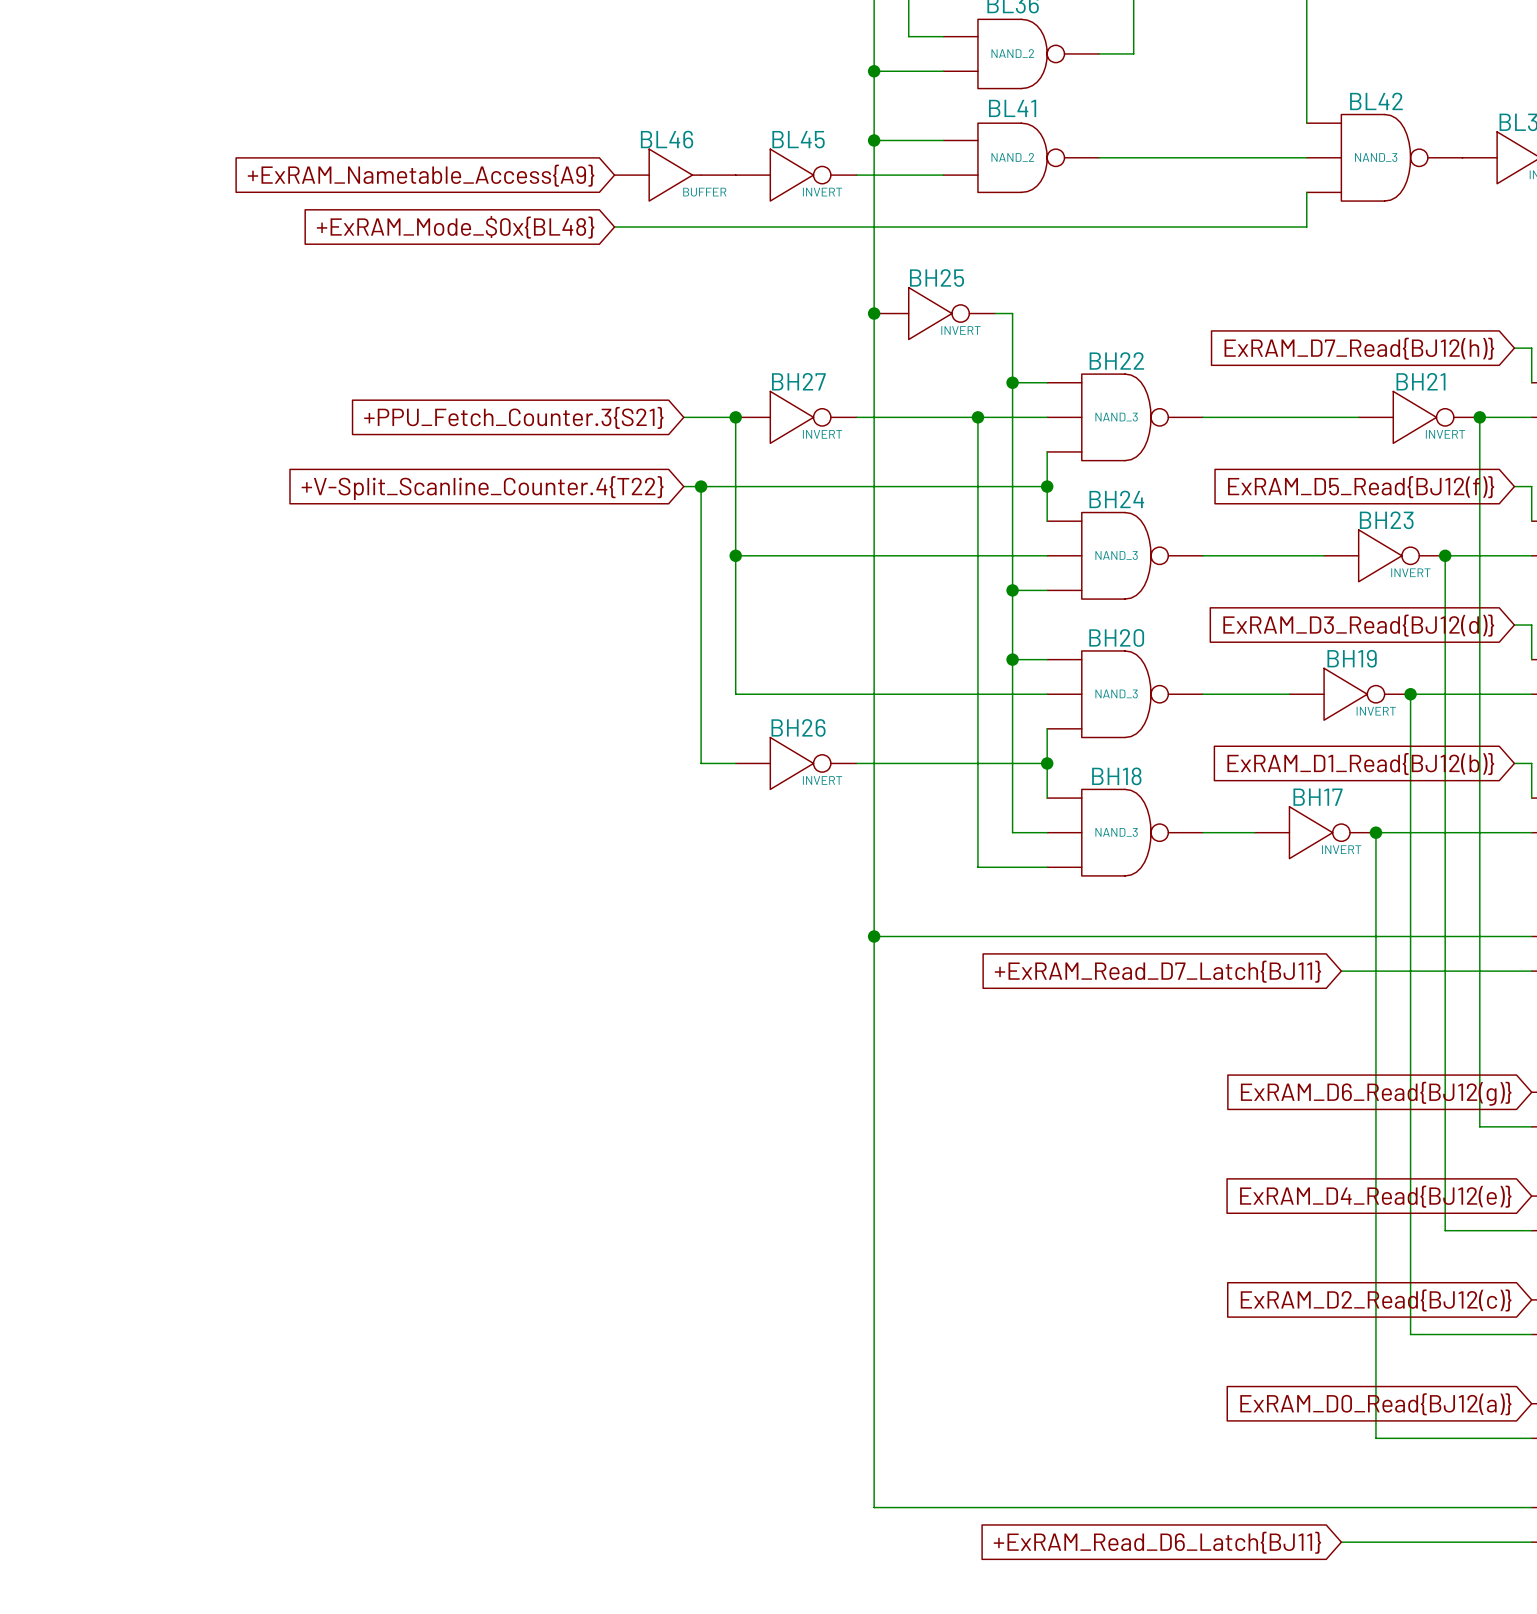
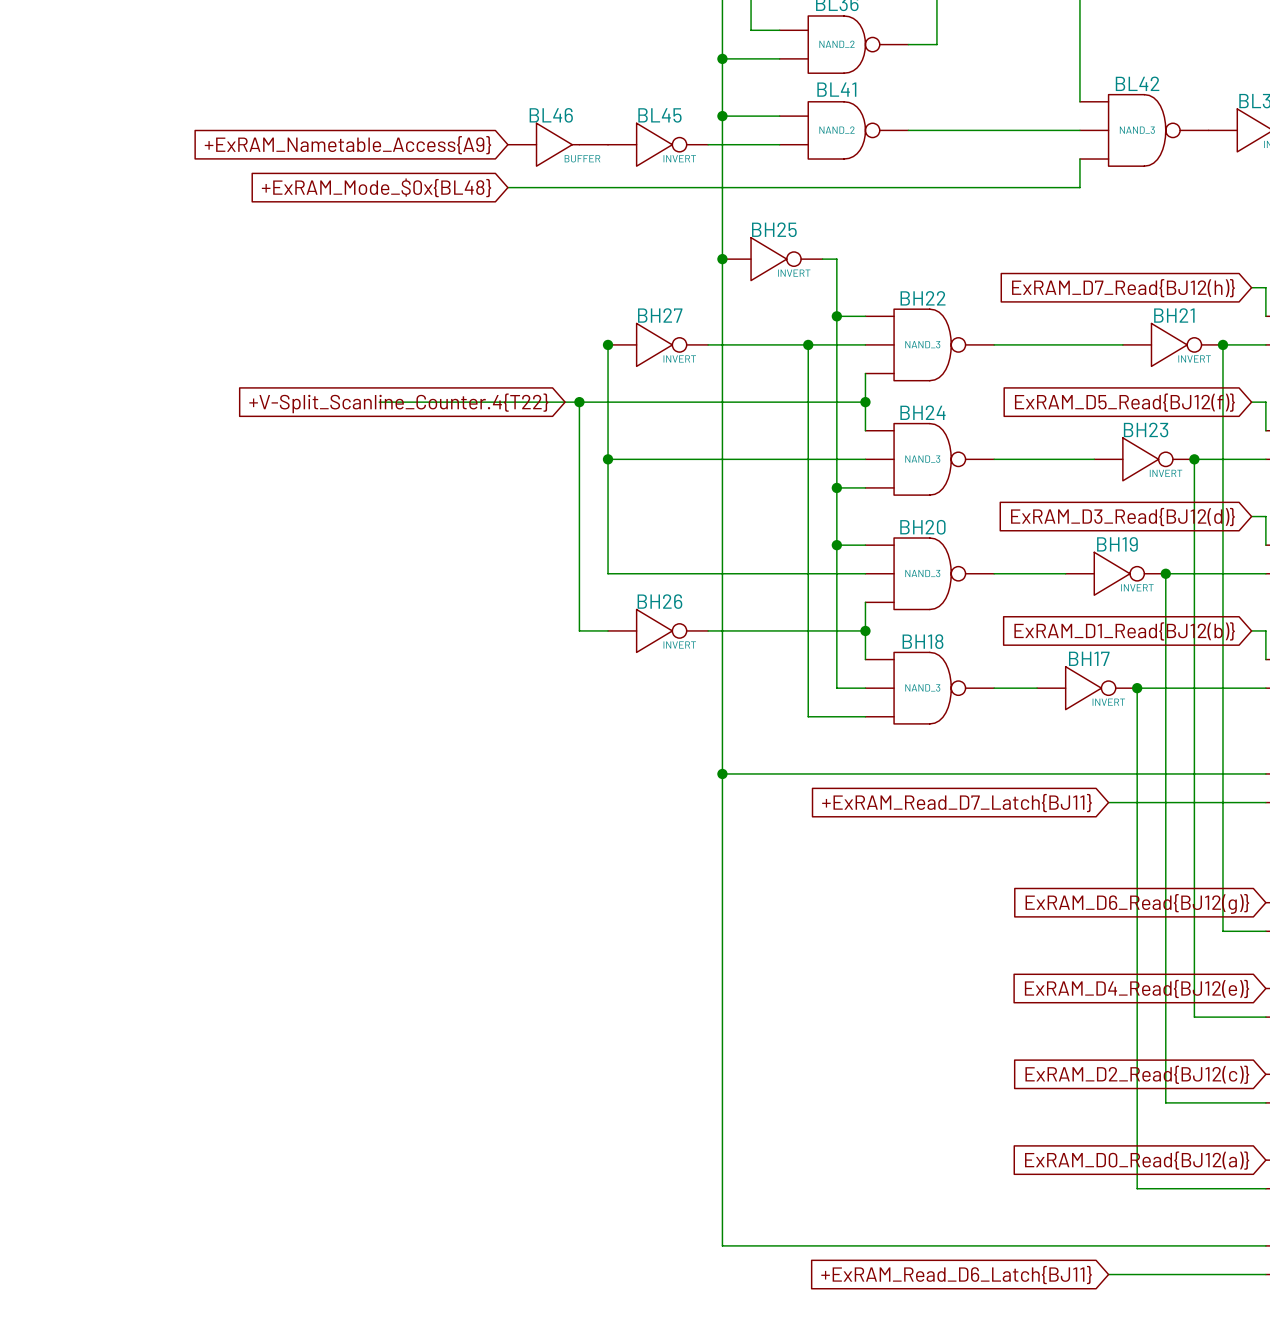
global label: +PPU_Fetch_Counter.3{S21} (513, 417) -> none
wire: (683, 417) (735, 417) -> none
wire: none -> (379, 402) (565, 402)

